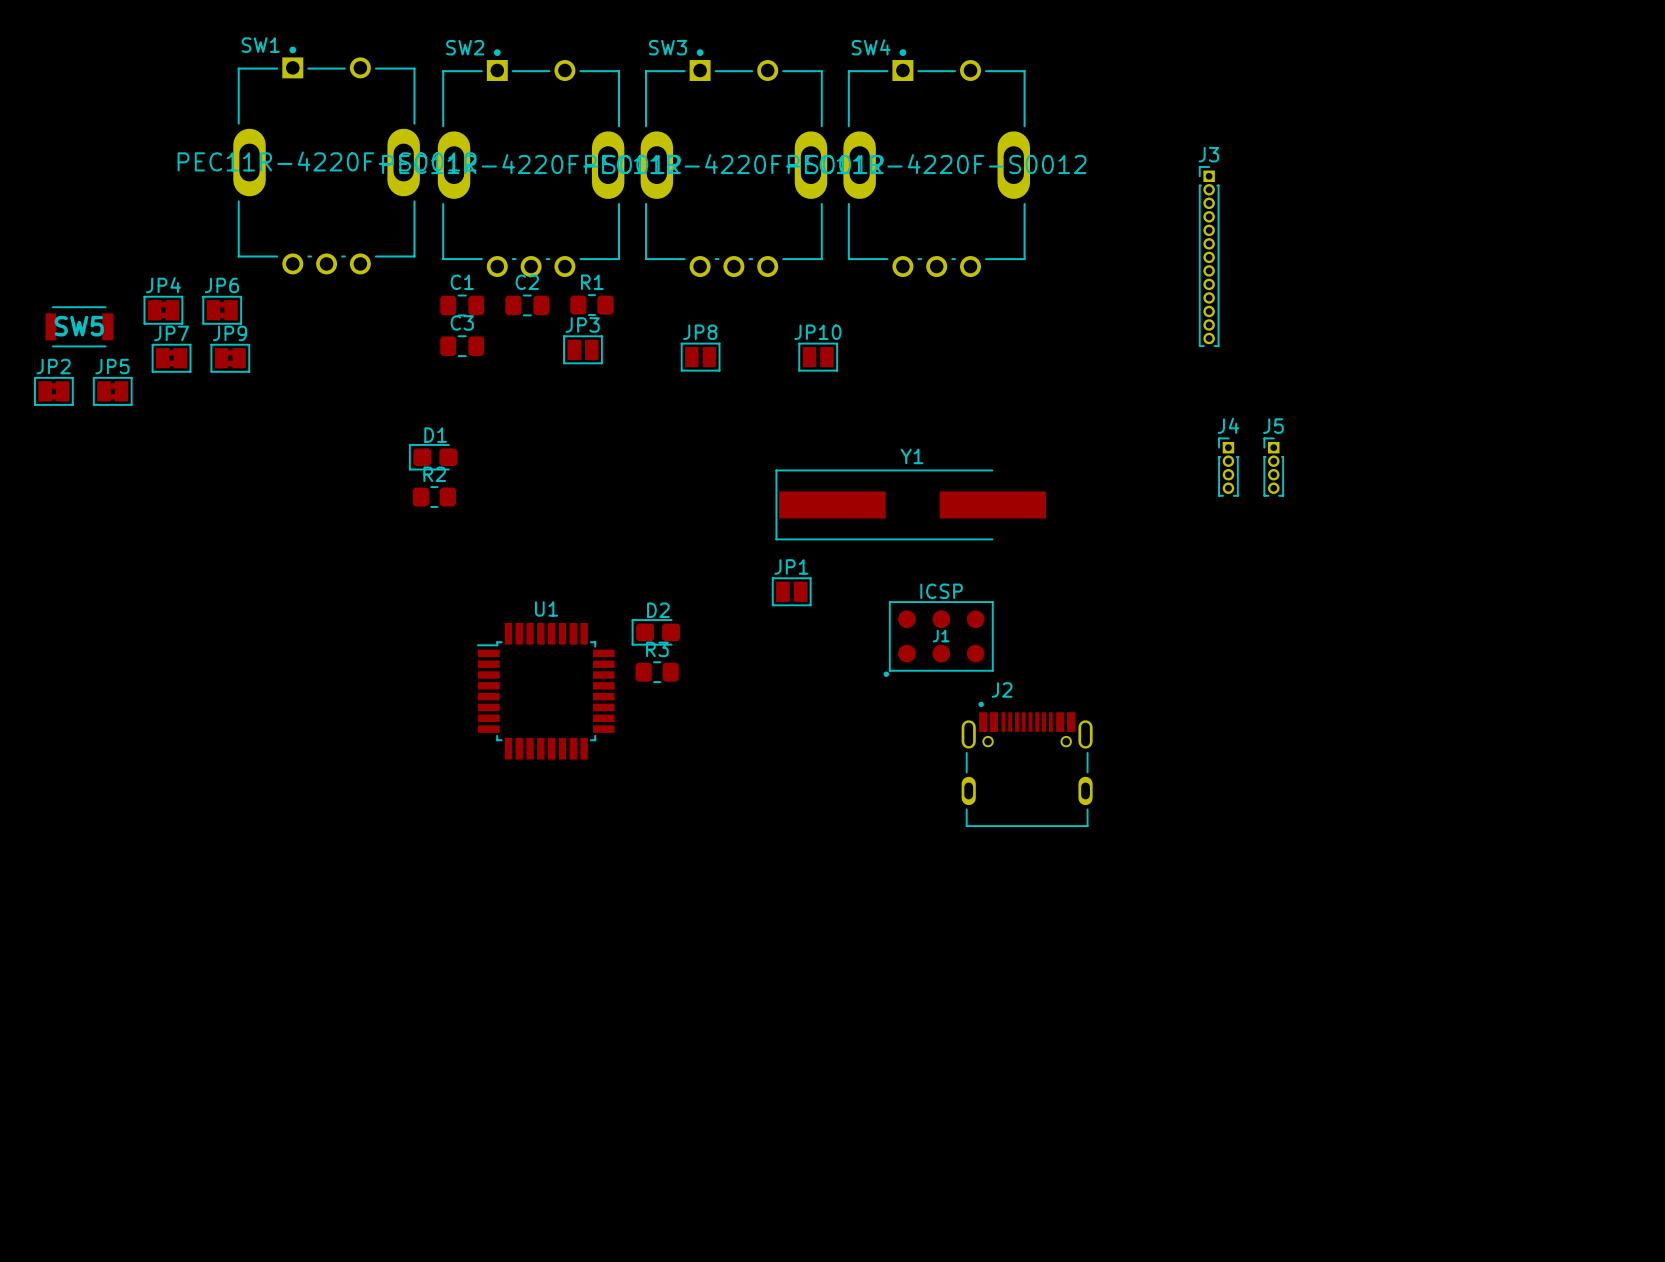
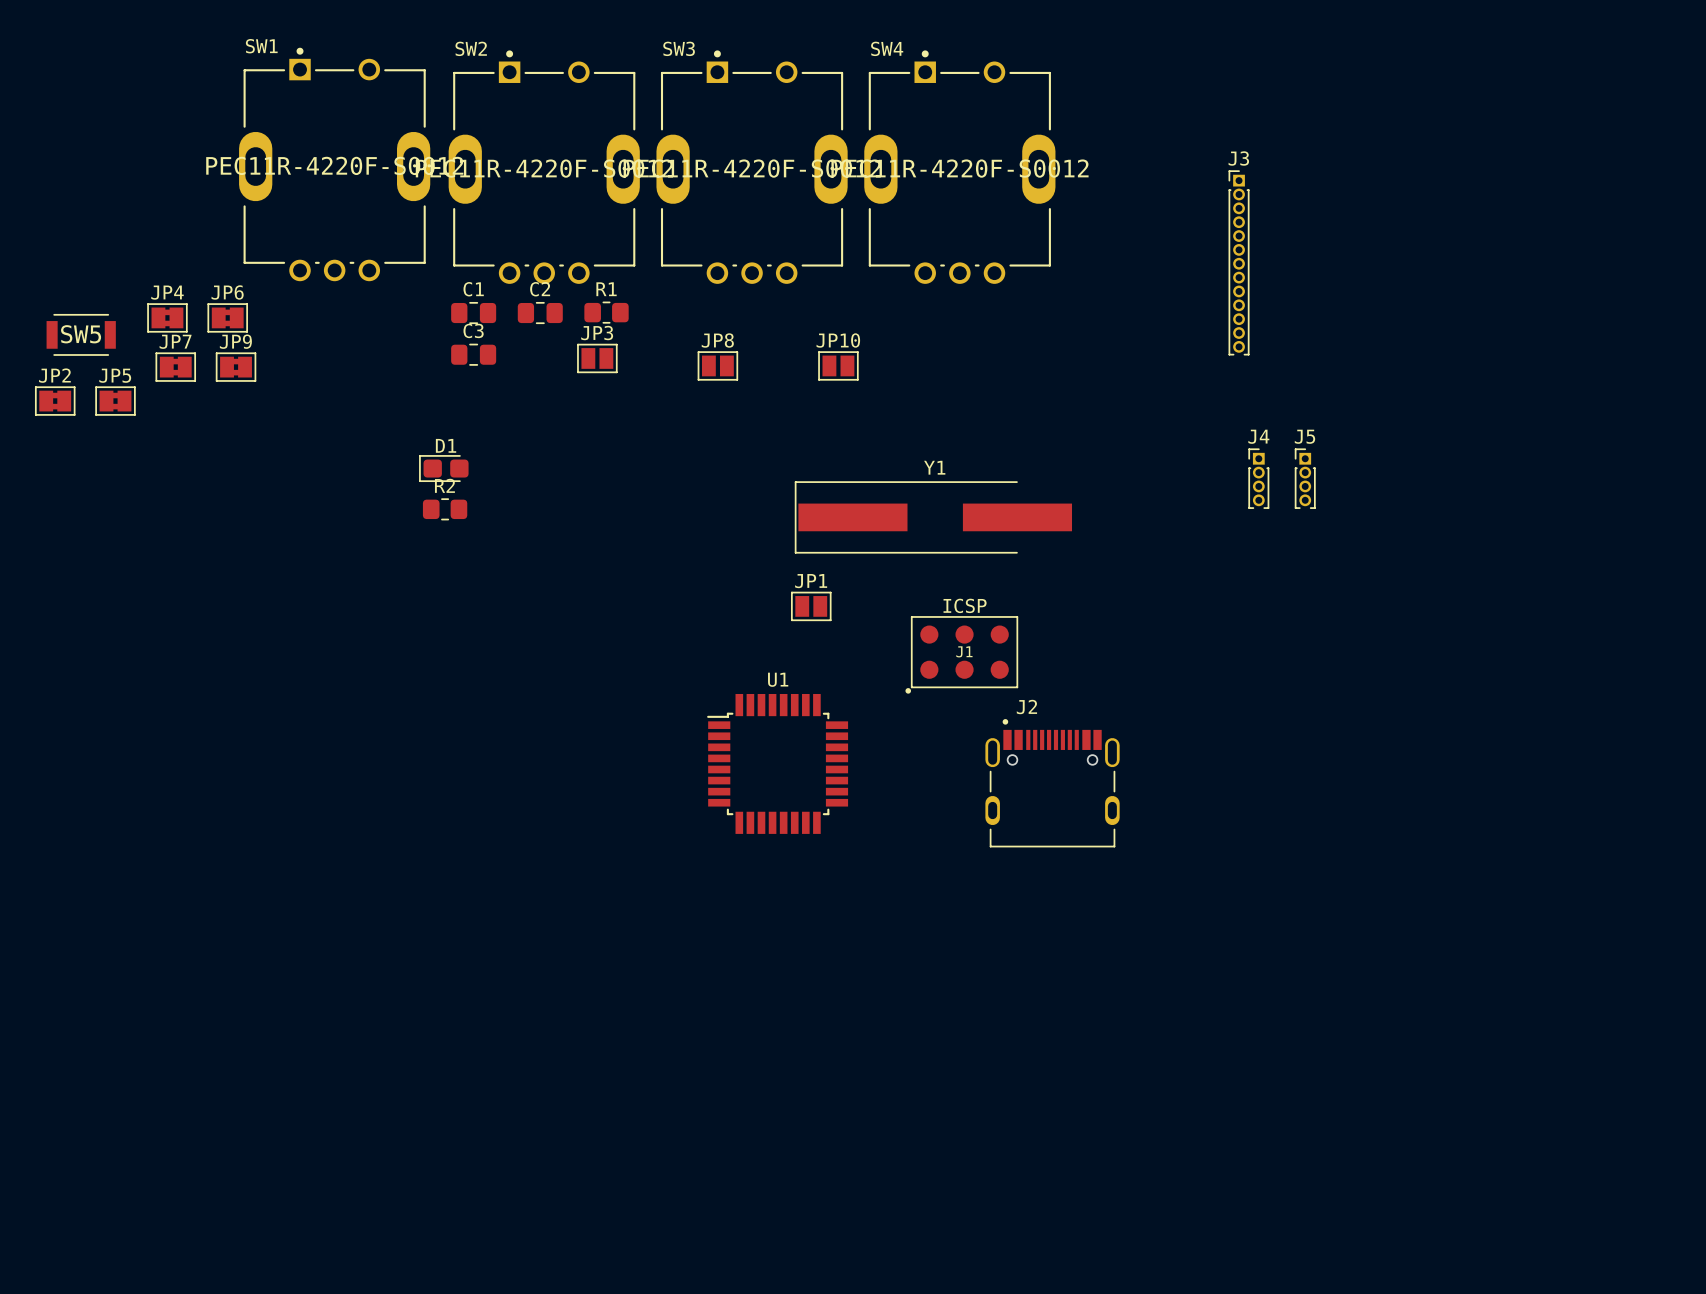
D2: (655, 632) -> none
R3: (657, 672) -> none
U1 position: (545, 691) -> (777, 763)

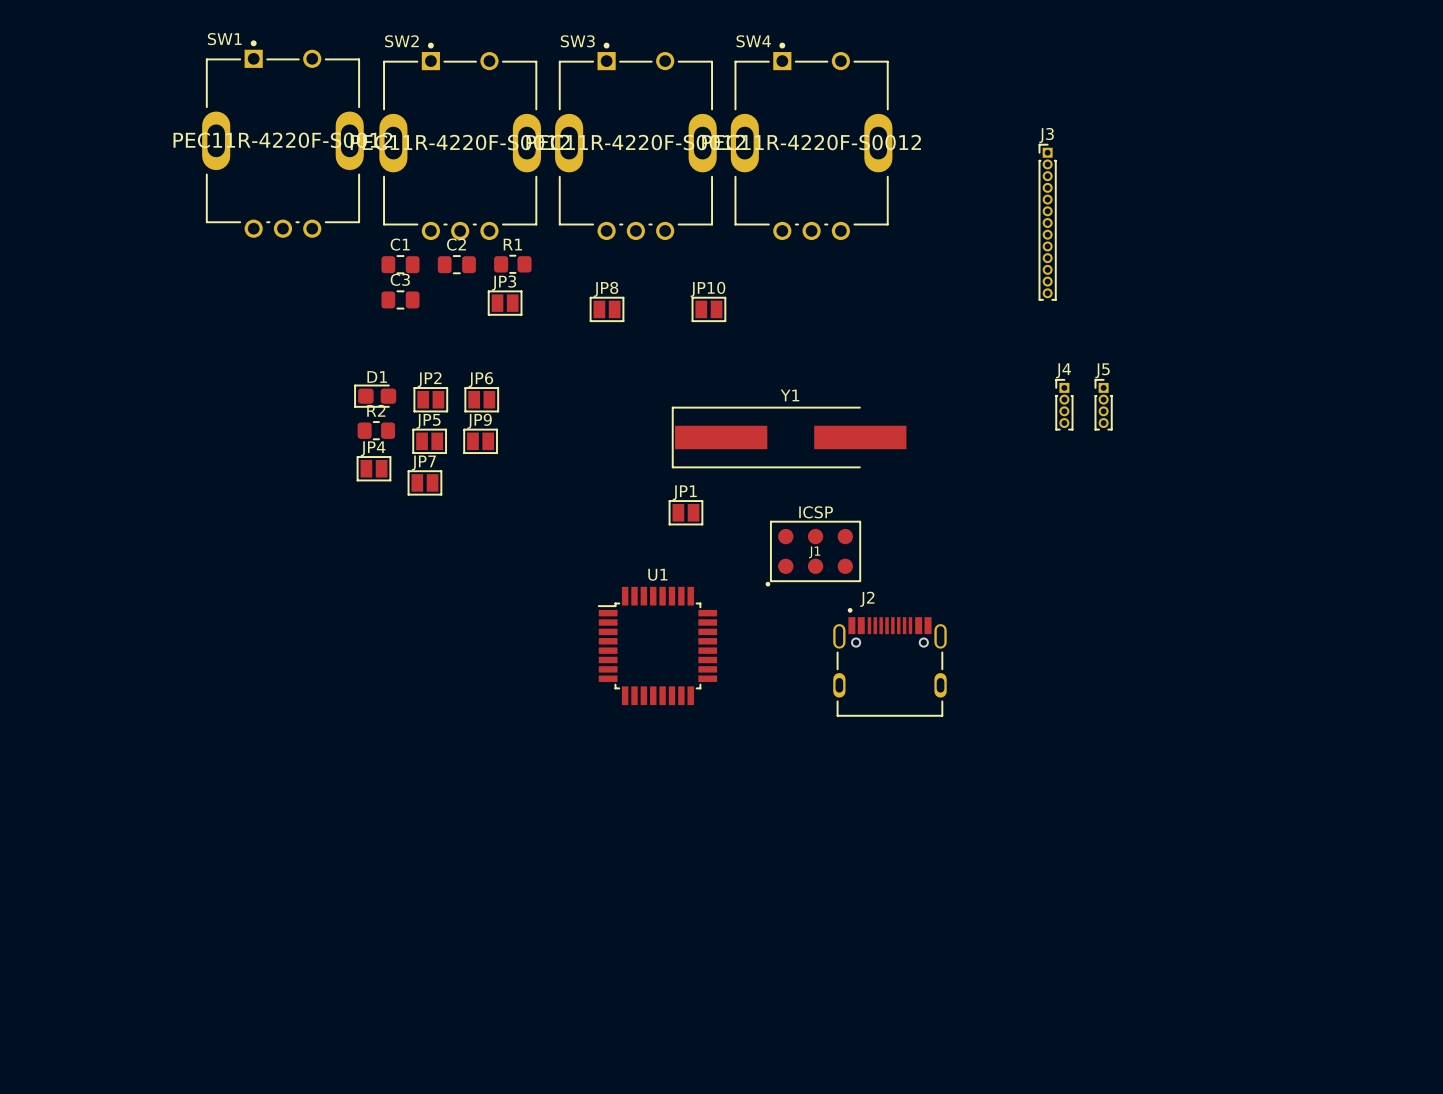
JP4 footprint: [147, 303, 188, 333] -> [356, 456, 392, 482]
JP6 footprint: [207, 303, 248, 333] -> [464, 387, 499, 413]
SW5: (81, 334) -> none
JP7 footprint: [155, 352, 196, 382] -> [407, 470, 443, 496]
JP9 footprint: [215, 352, 257, 382] -> [463, 428, 498, 454]
JP2 footprint: [35, 386, 76, 416] -> [413, 387, 448, 413]
JP5 footprint: [95, 386, 136, 416] -> [412, 428, 447, 454]

